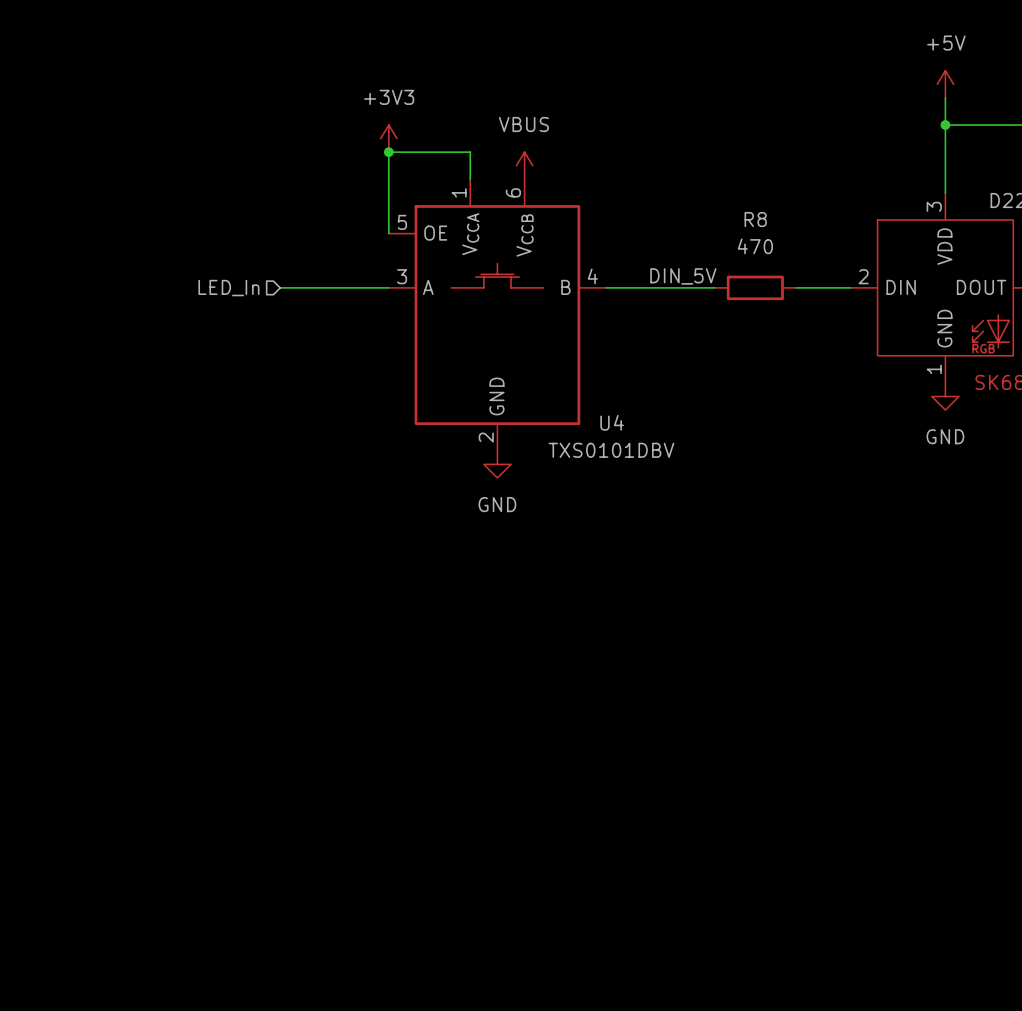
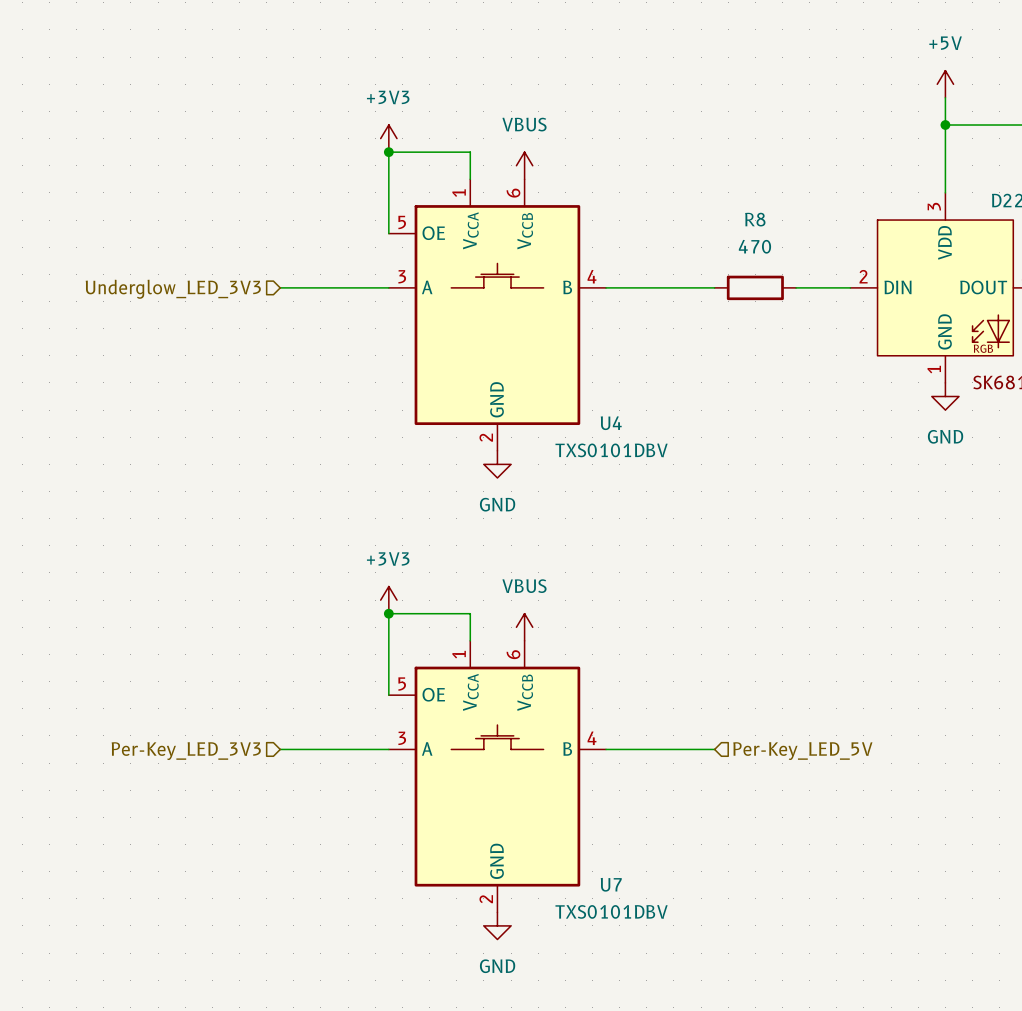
label: DIN_5V (683, 276) -> none
hierarchical label: LED_In (228, 288) -> Underglow_LED_3V3 (173, 289)
power symbol: none -> +3V3 (388, 600)
junction: none -> (388, 613)
power symbol: none -> VBUS (524, 627)
wire: none -> (470, 640) (470, 613) (388, 613) (388, 695)
wire: none -> (280, 749) (388, 749)
wire: none -> (606, 749) (714, 749)
hierarchical label: none -> Per-Key_LED_3V3 (186, 751)
hierarchical label: none -> Per-Key_LED_5V (802, 751)
U7: none -> TXS0101DBV (497, 776)
power symbol: none -> GND (497, 925)

